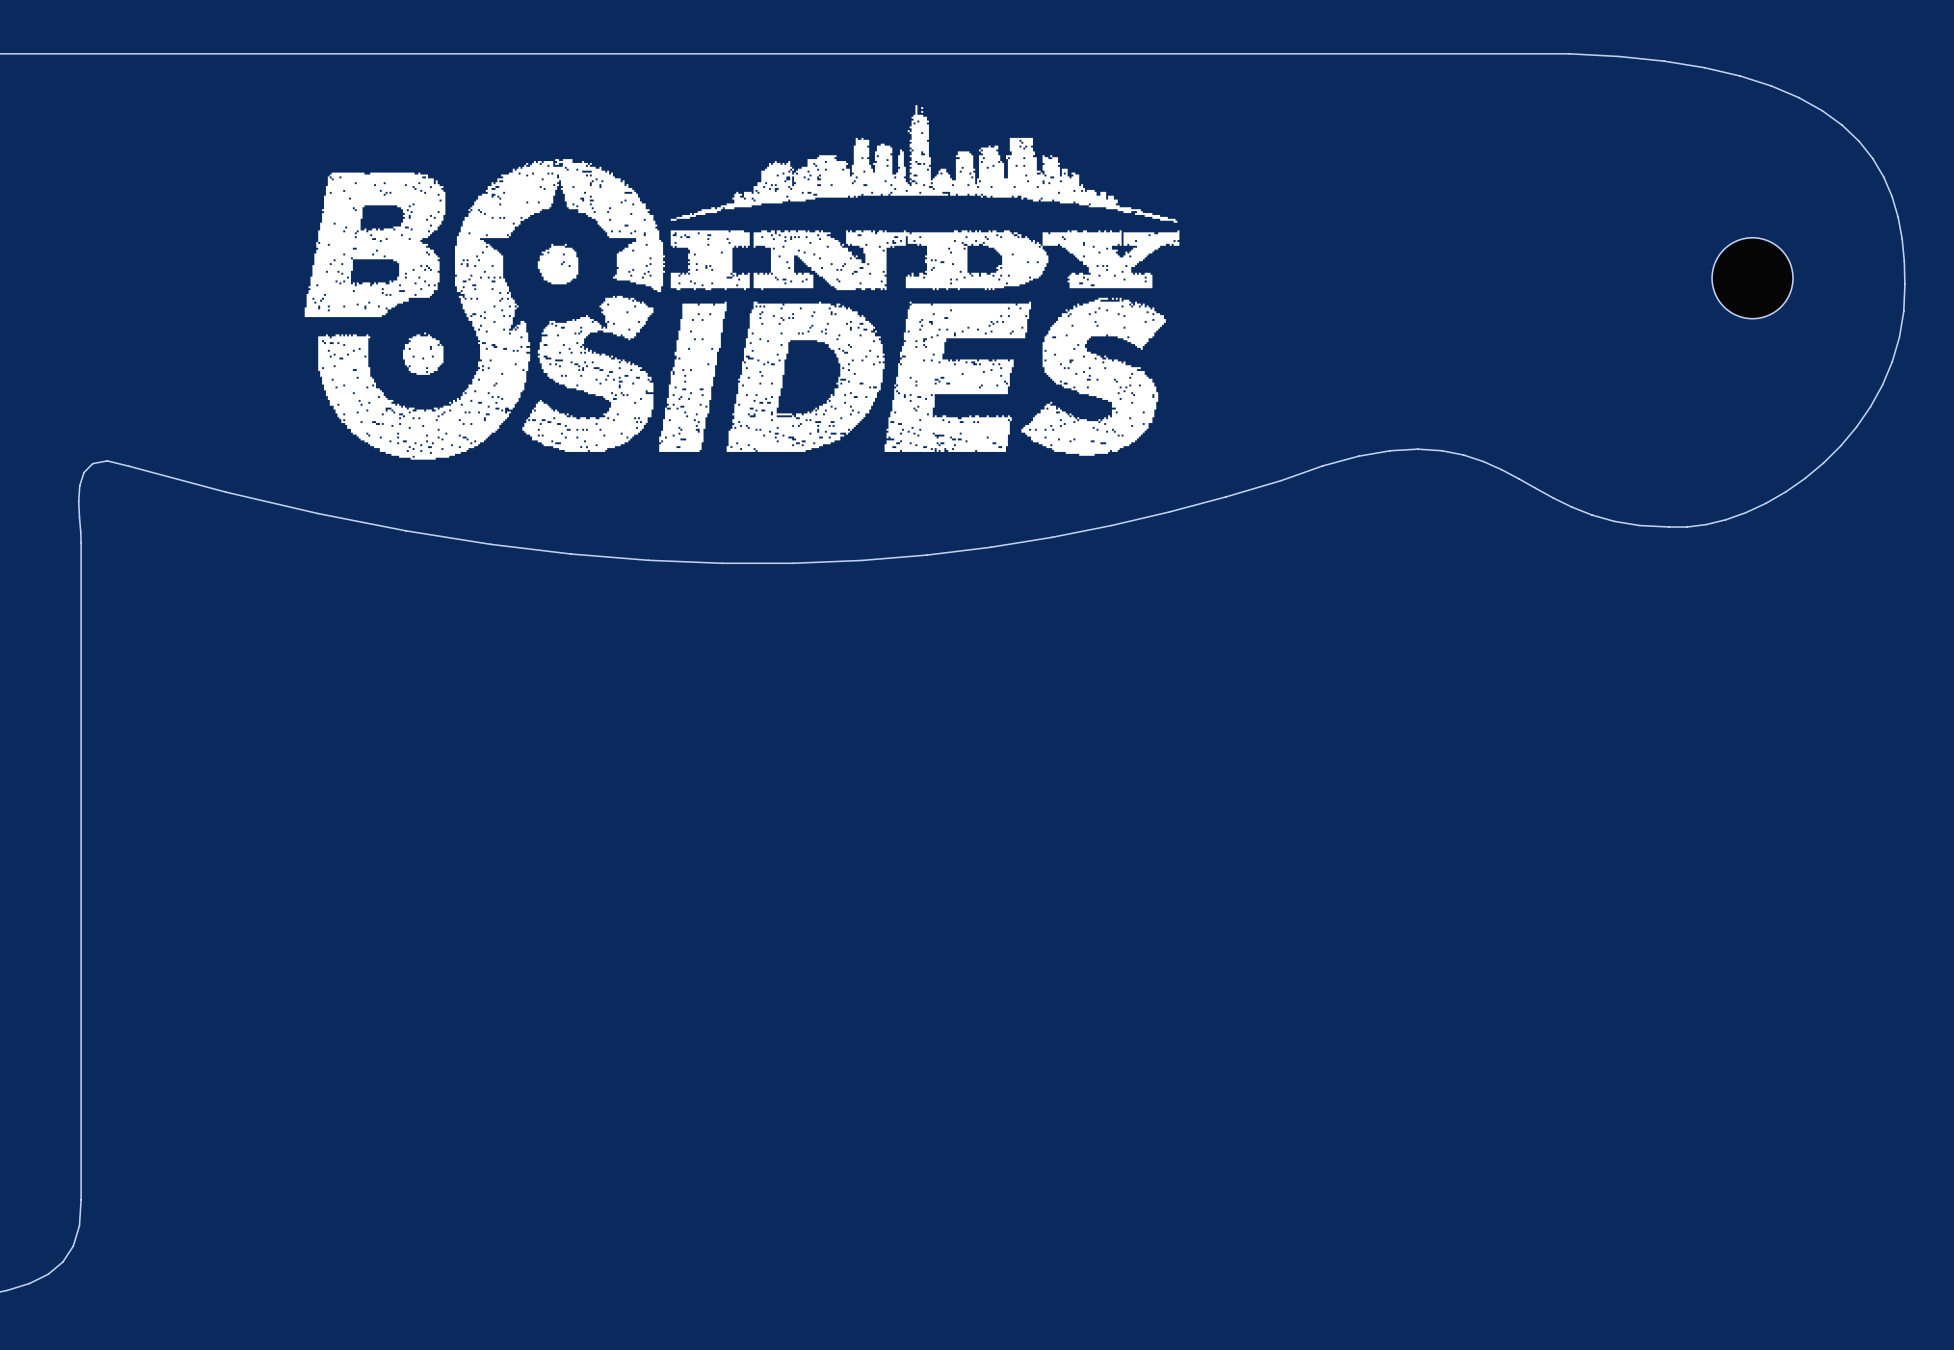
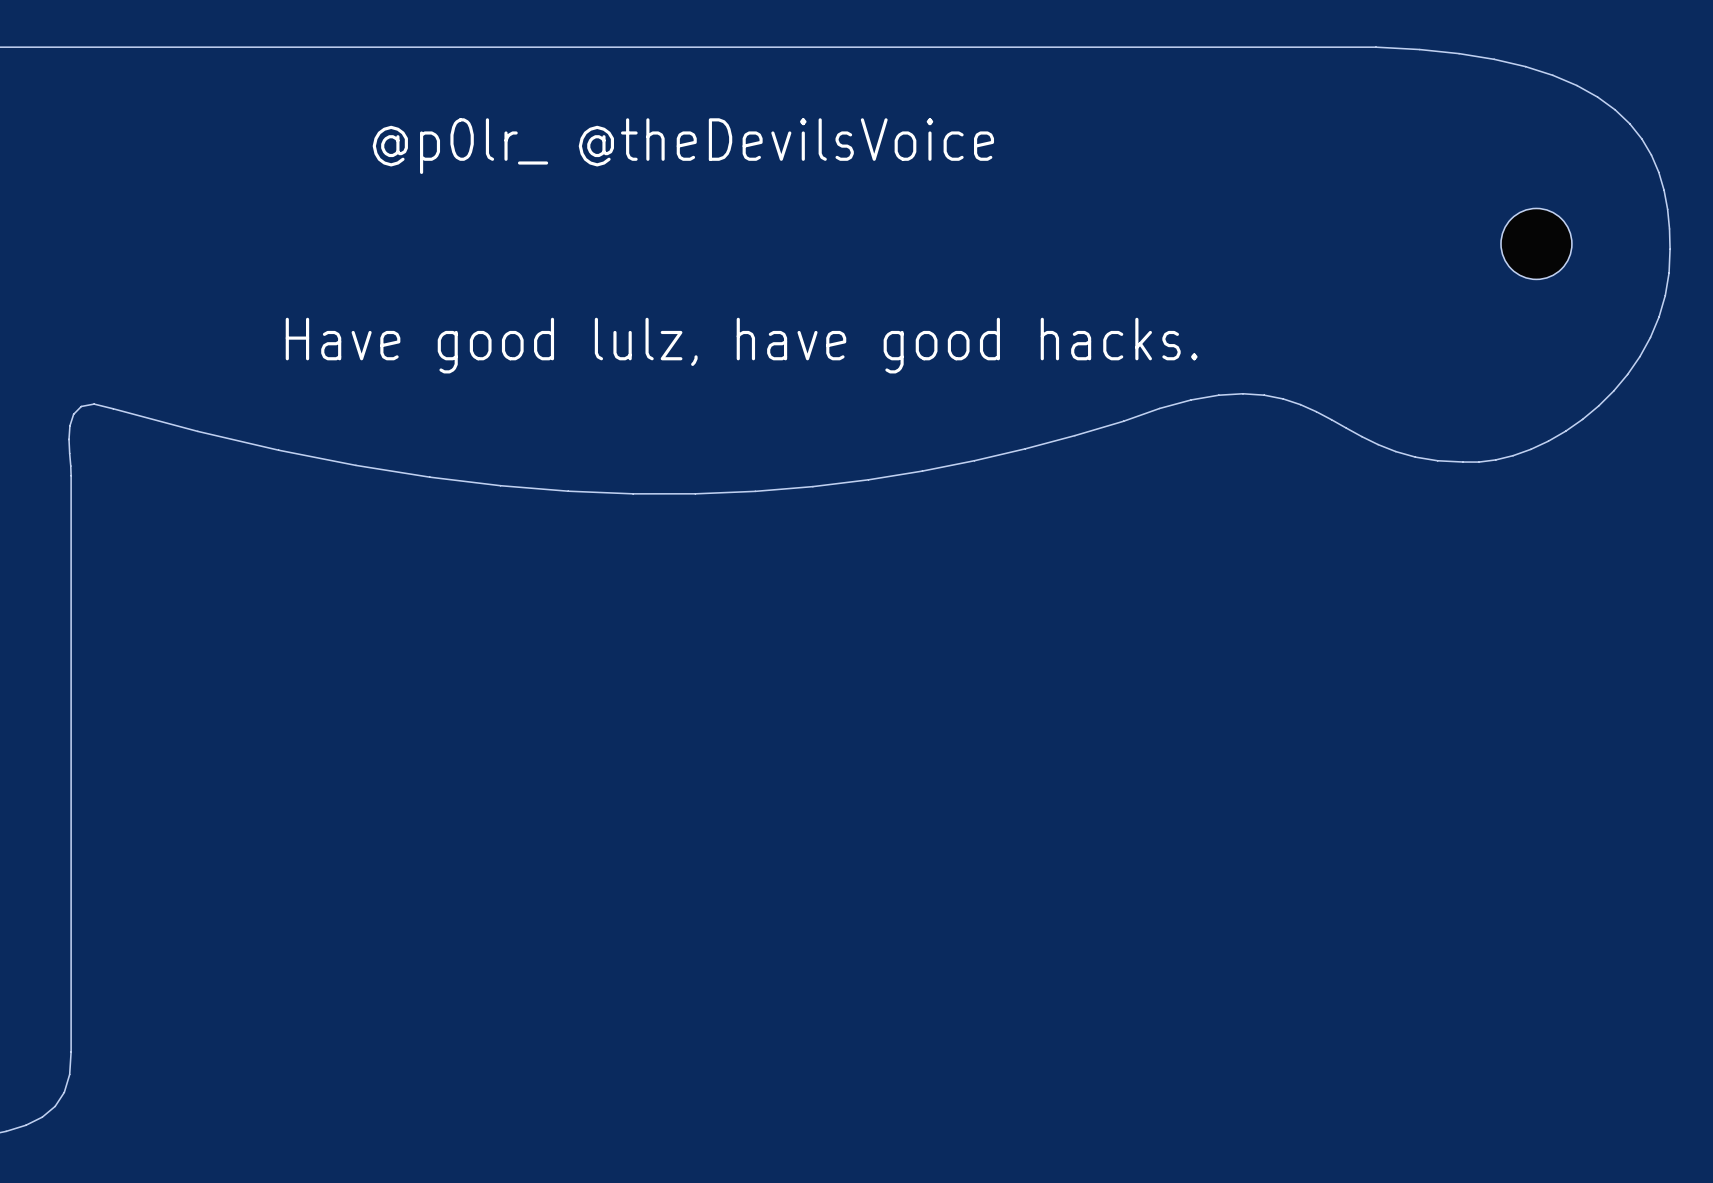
drawing: [304, 105, 1180, 460] -> none
text: none -> @p0lr_ @theDevilsVoice (683, 146)
drawing: [537, 243, 579, 285] -> none
drawing: [402, 332, 444, 375] -> none
text: none -> Have good lulz, have good hacks. (741, 345)

